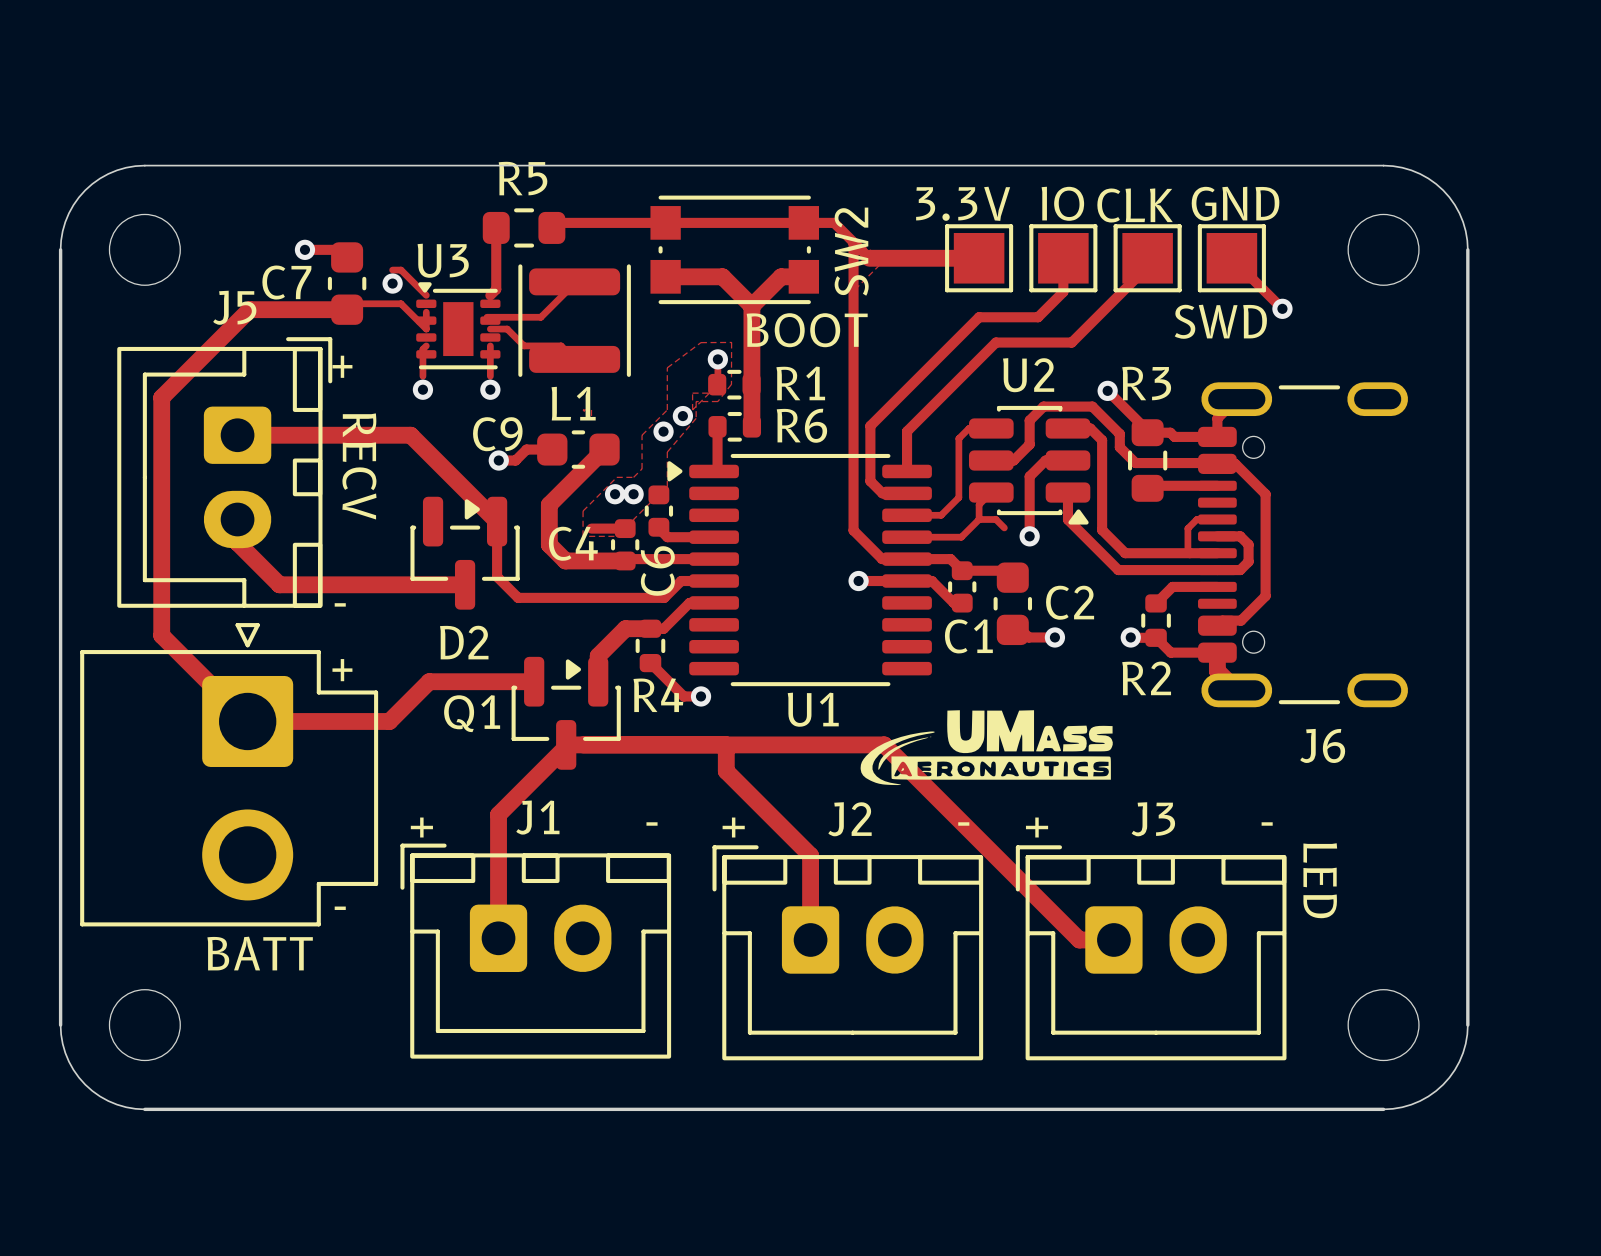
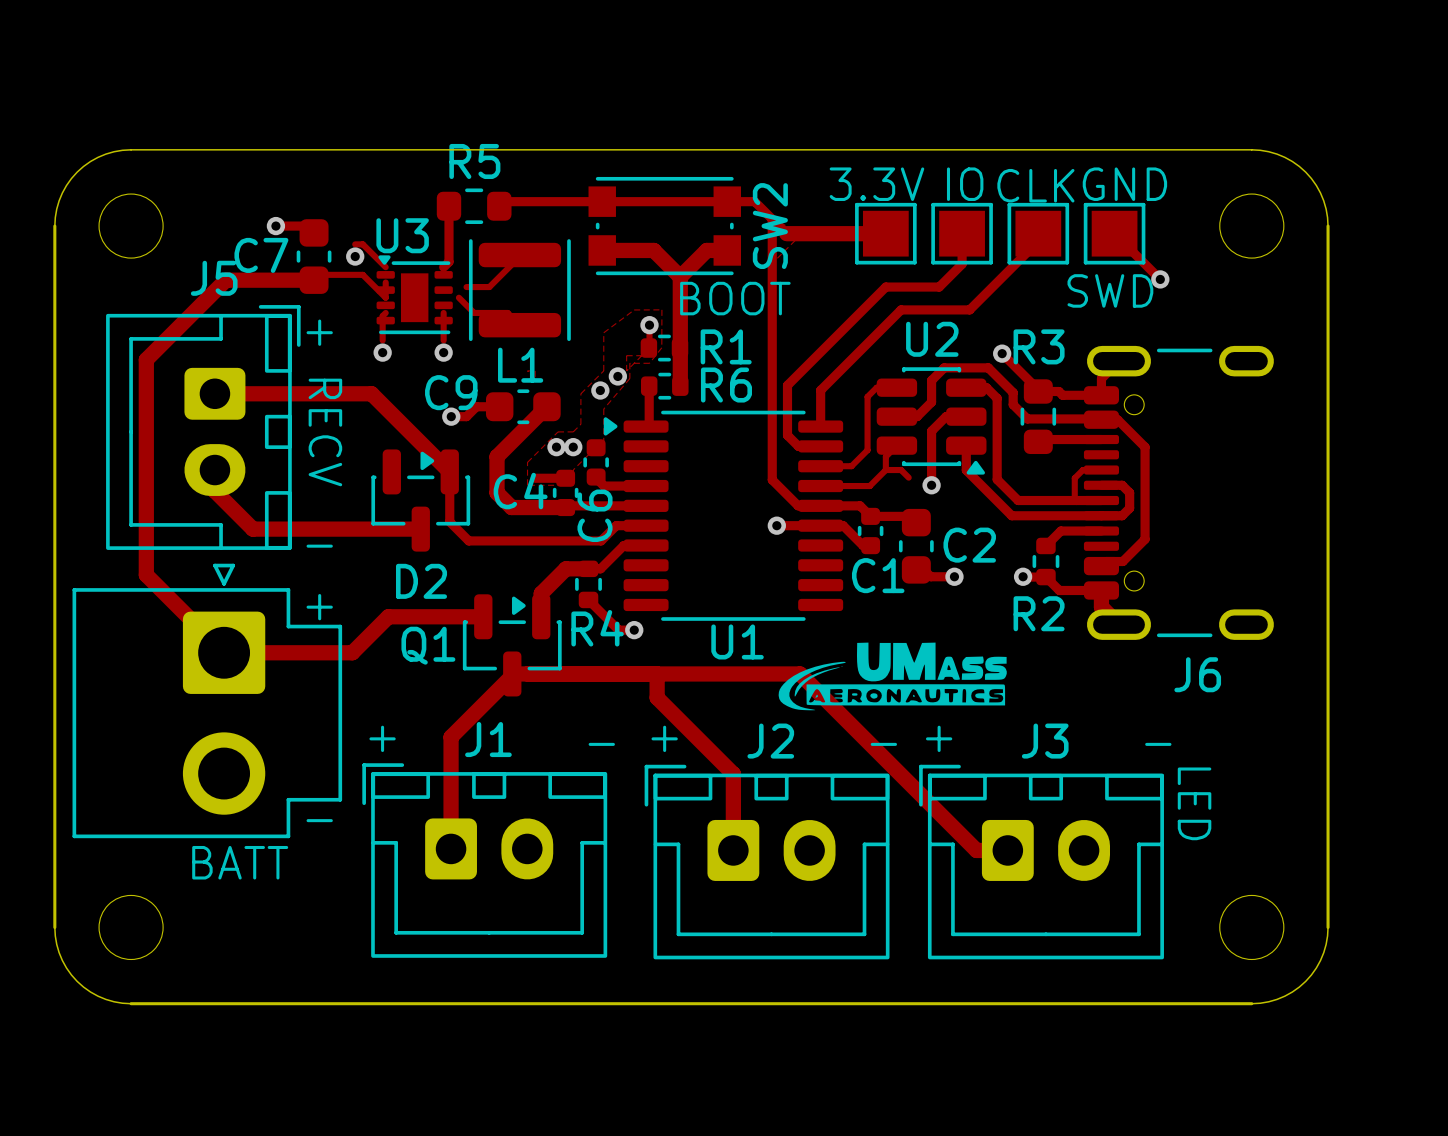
track: (486, 317) (515, 317) -> none
track: (490, 329) (507, 329) -> none

